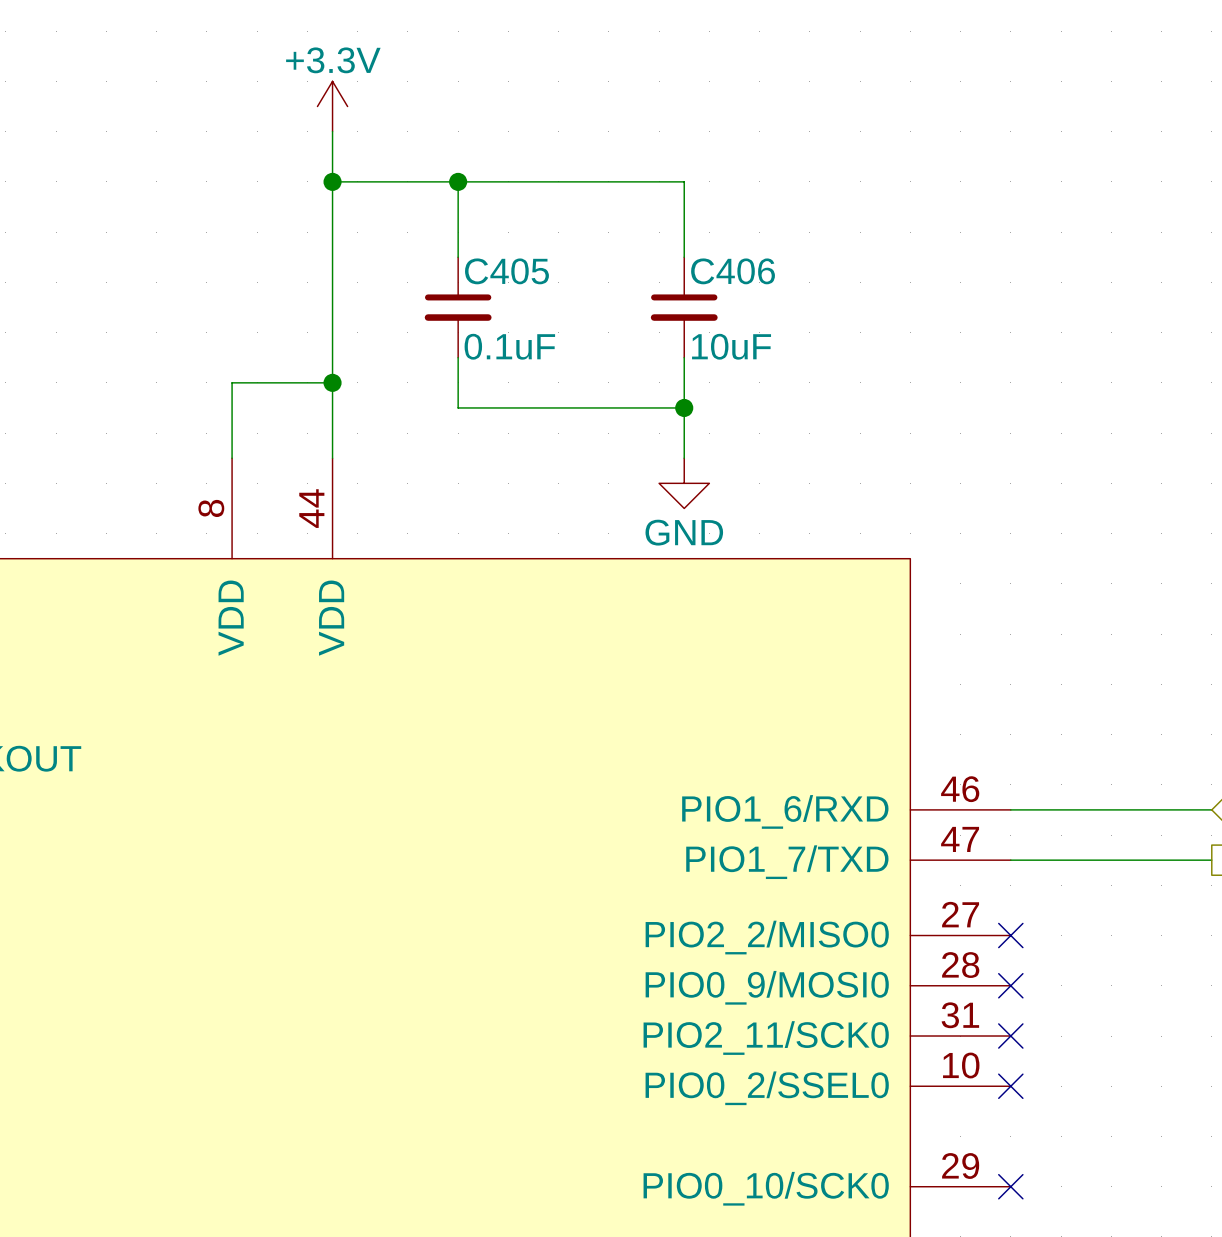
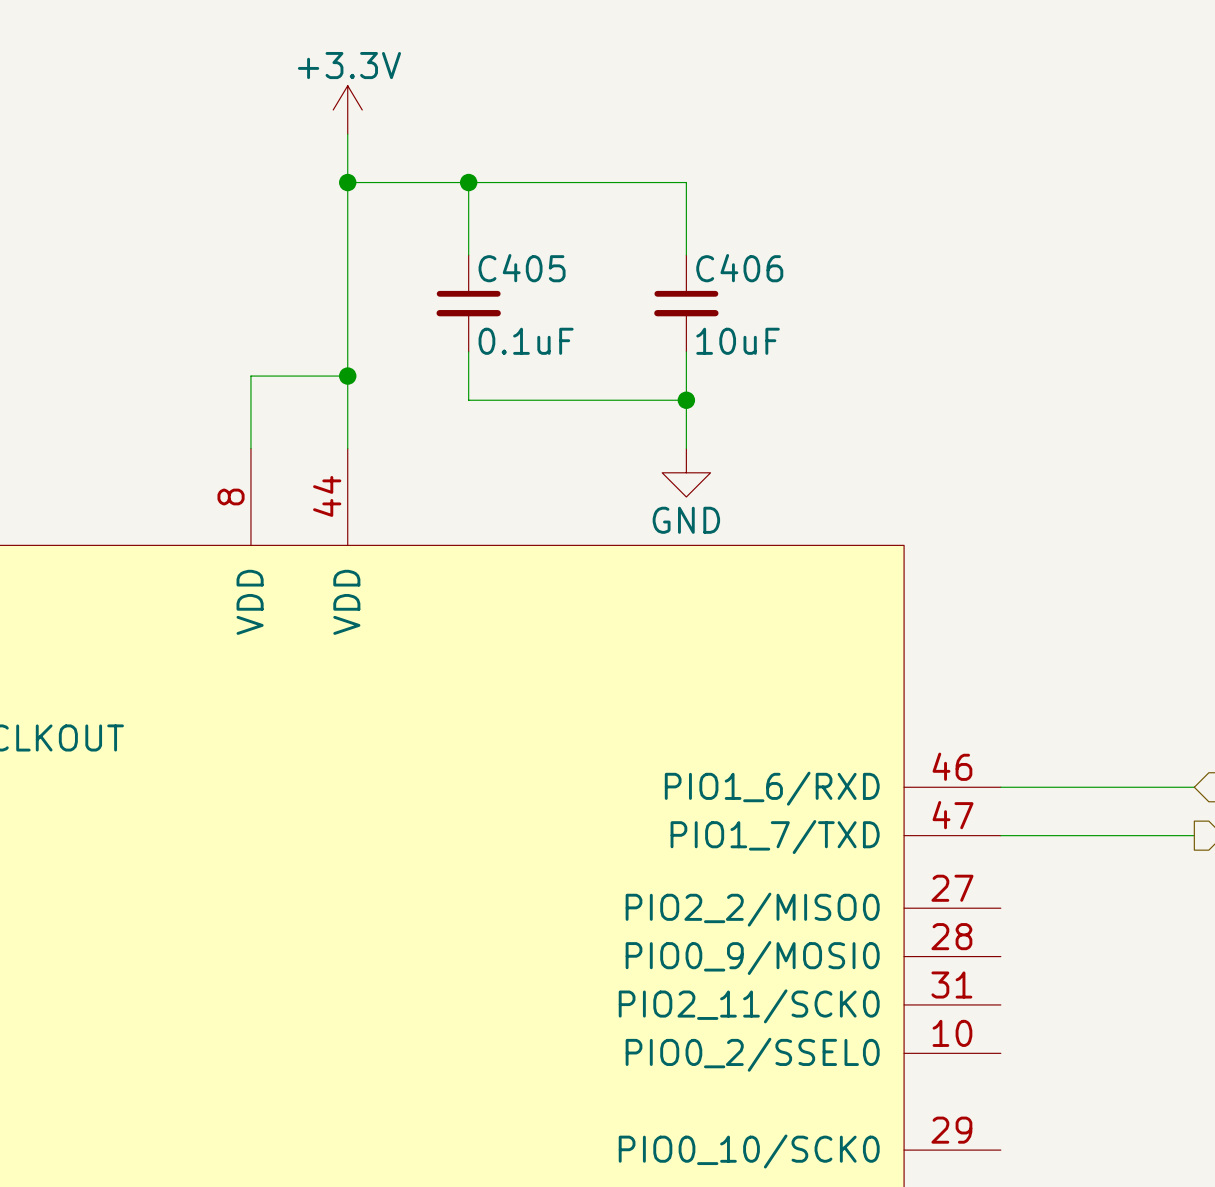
no-connect mark: (1010, 935) -> none
no-connect mark: (1010, 985) -> none
no-connect mark: (1010, 1036) -> none
no-connect mark: (1010, 1086) -> none
no-connect mark: (1010, 1186) -> none

